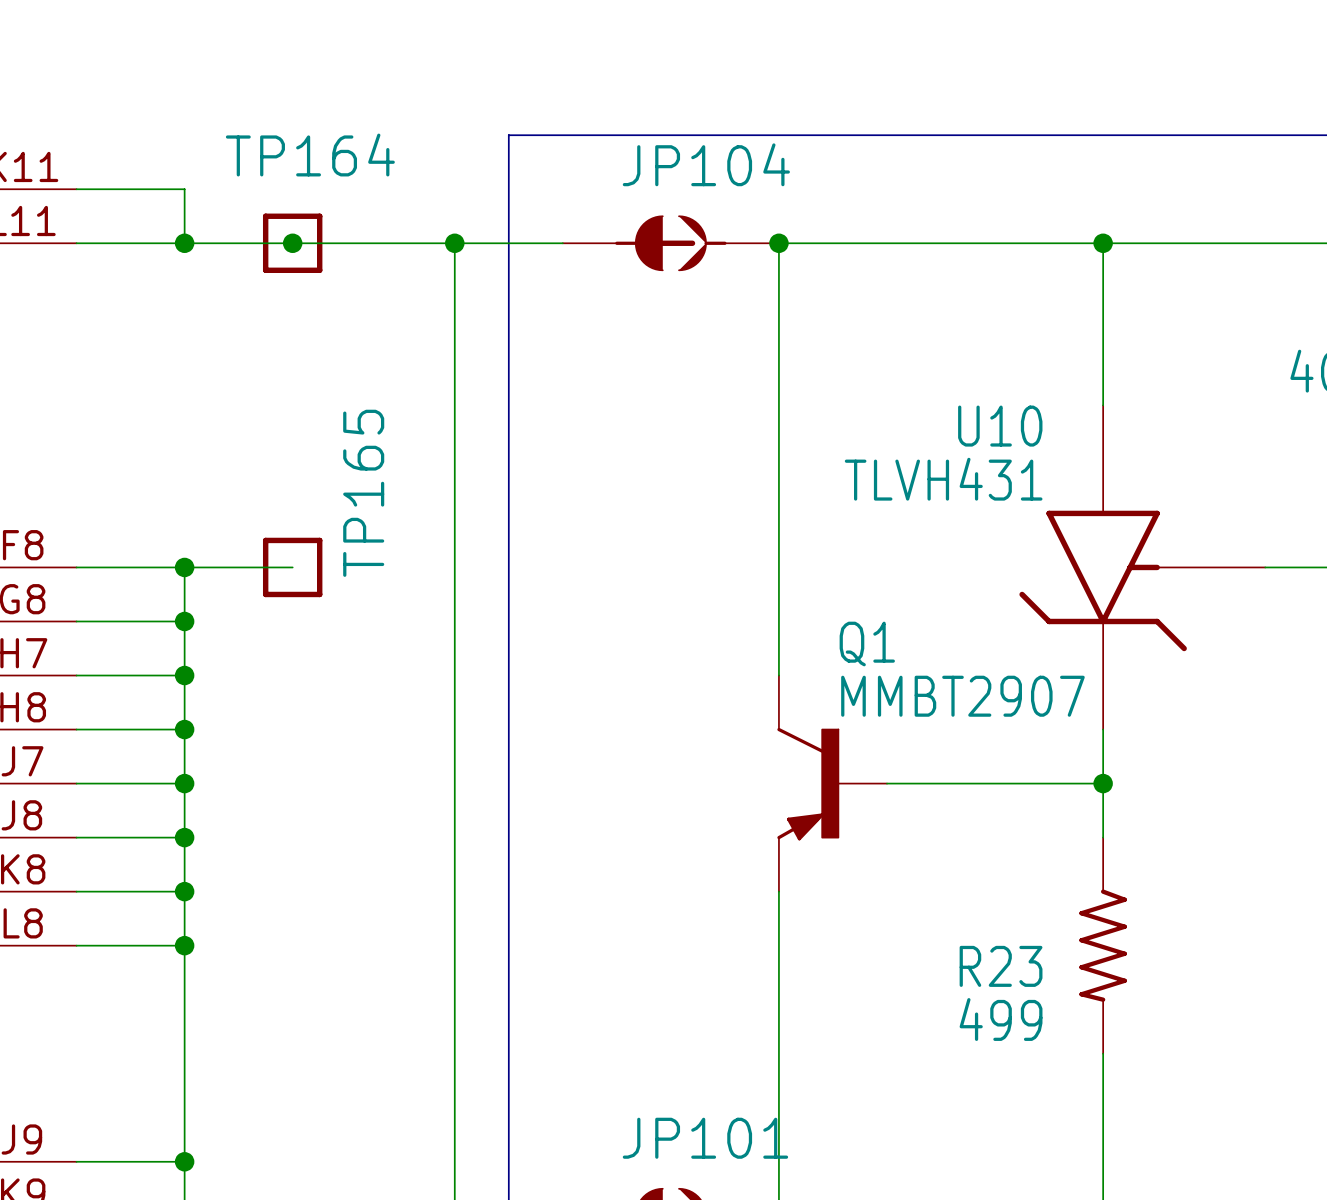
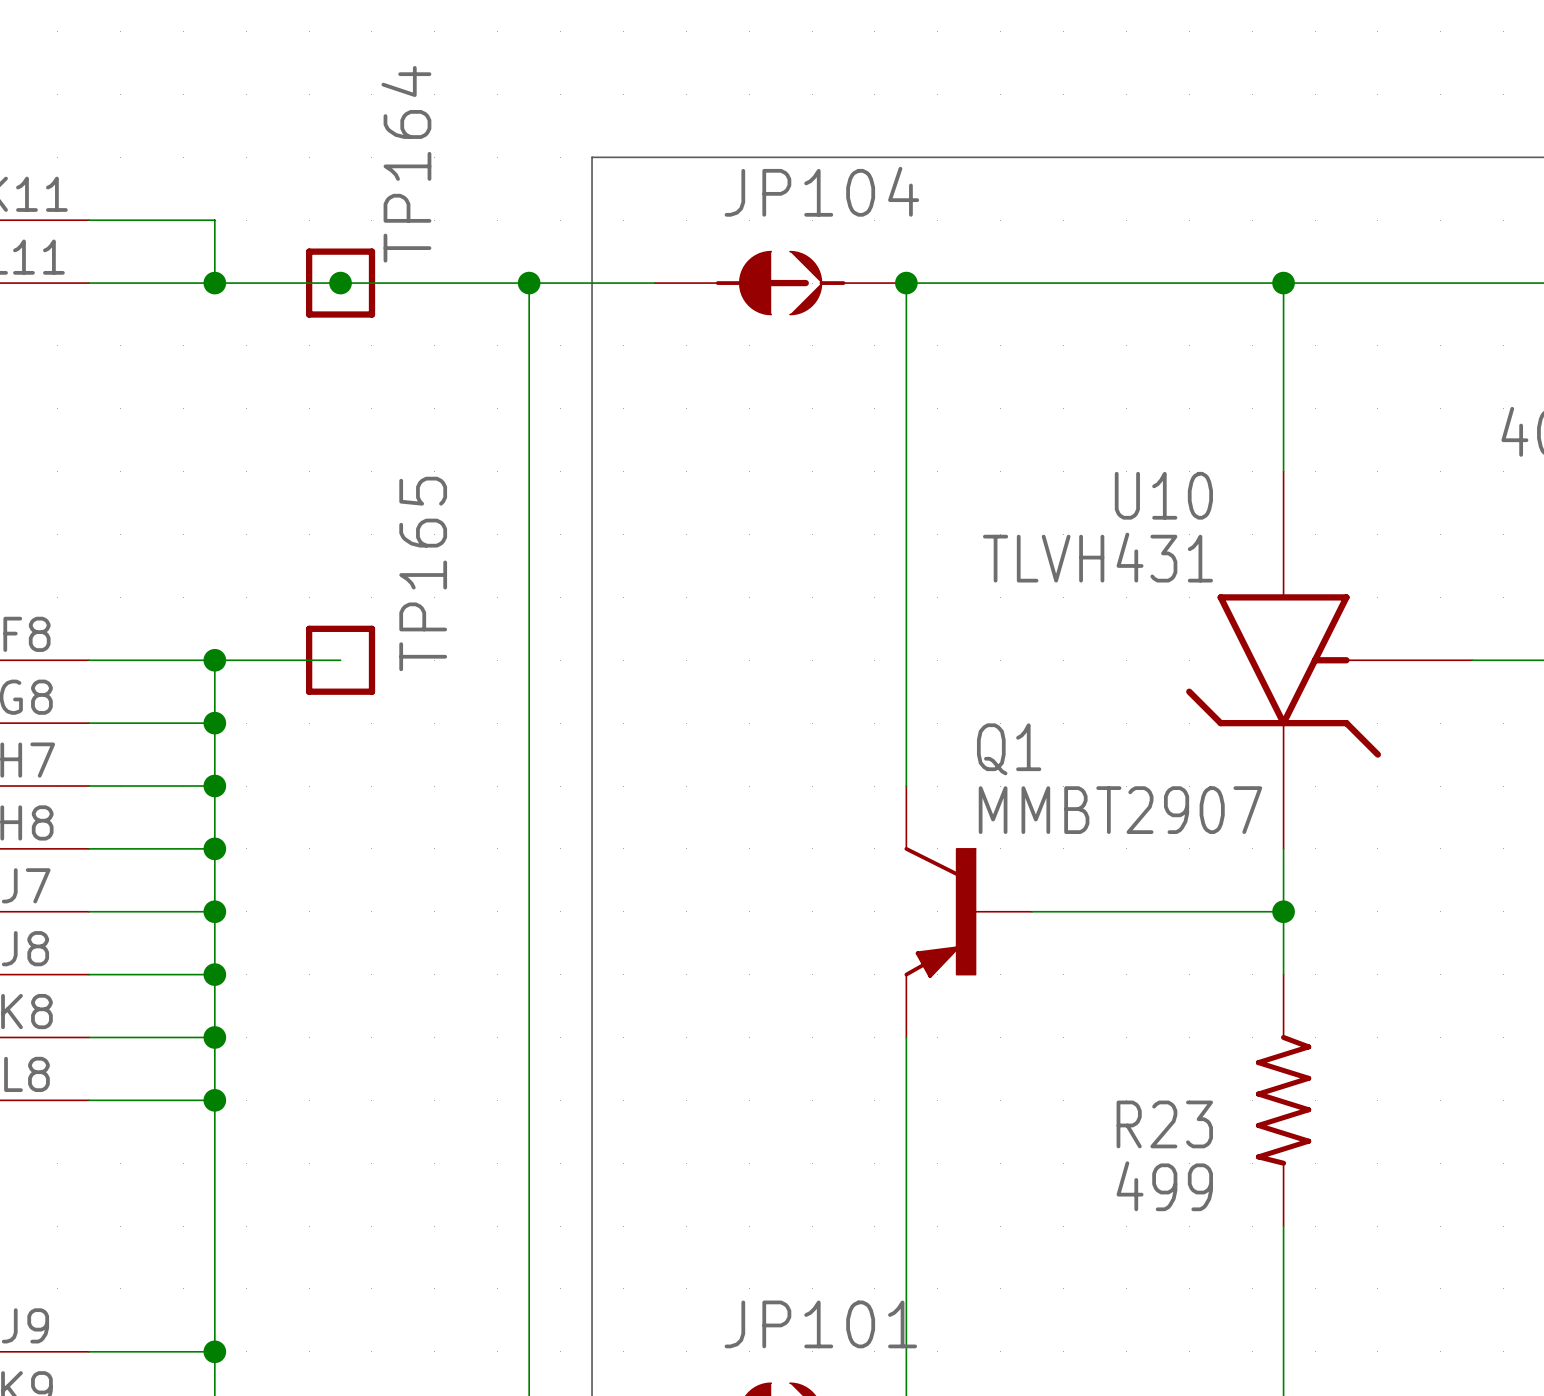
TP164 name rotation: 0° (310, 155) -> 90° counterclockwise (406, 164)

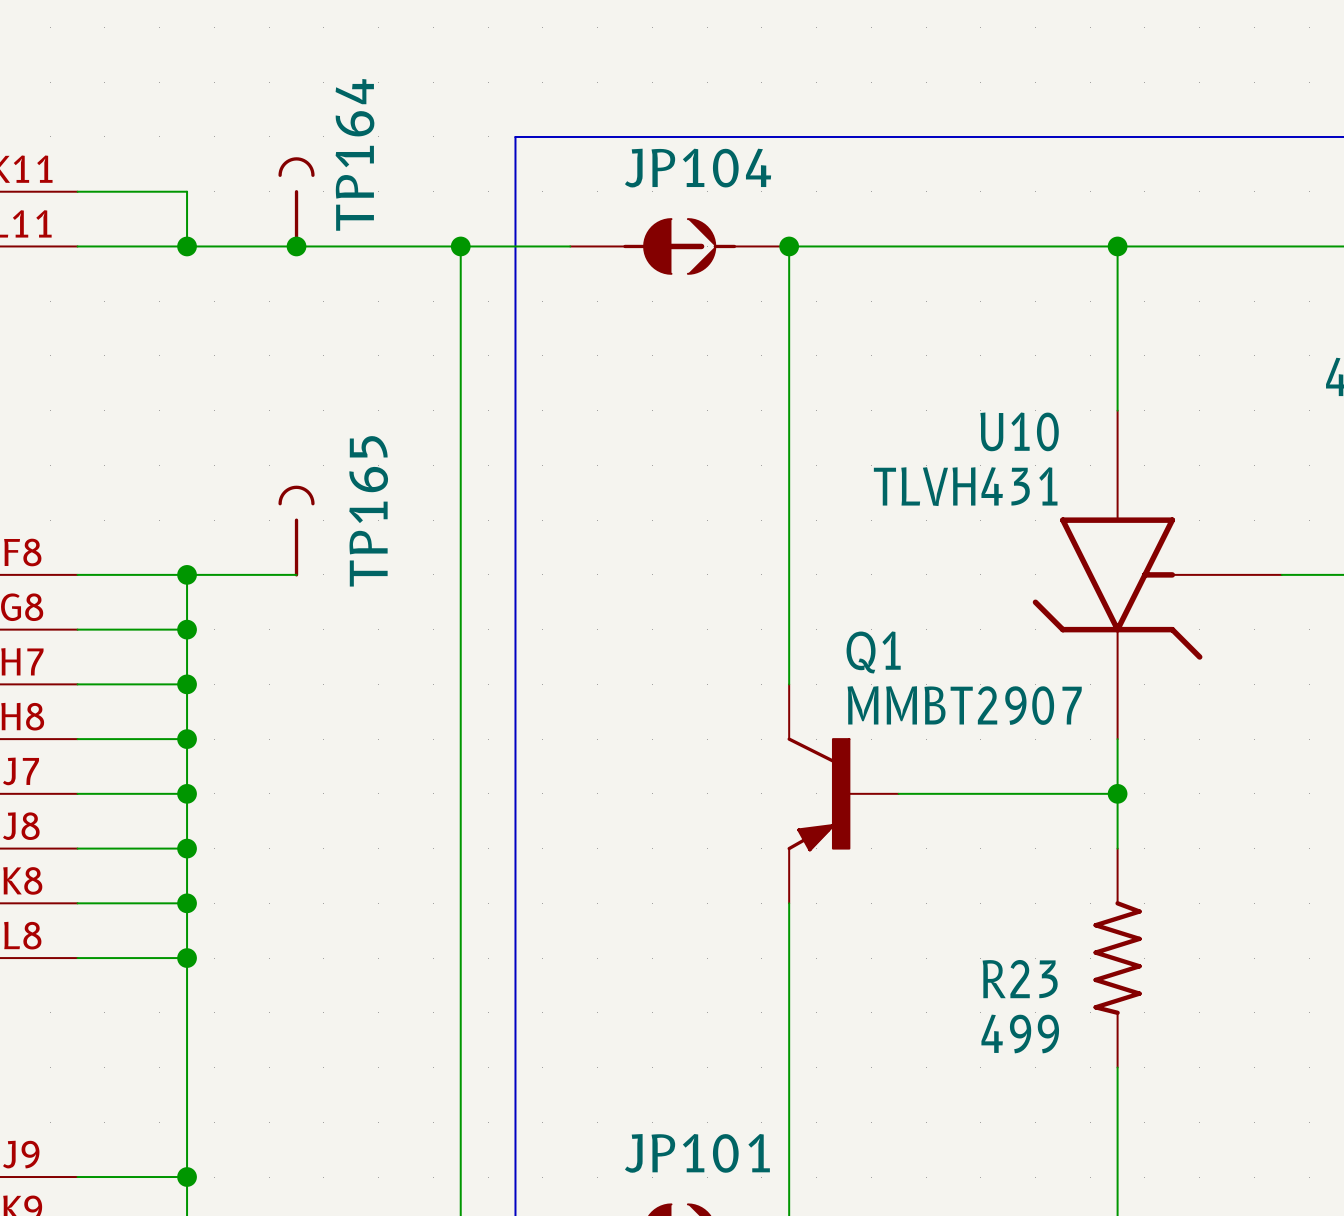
TP164 symbol: [305, 248, 376, 318] -> [278, 157, 315, 249]
TP165 symbol: [305, 625, 376, 695] -> [278, 485, 315, 577]

